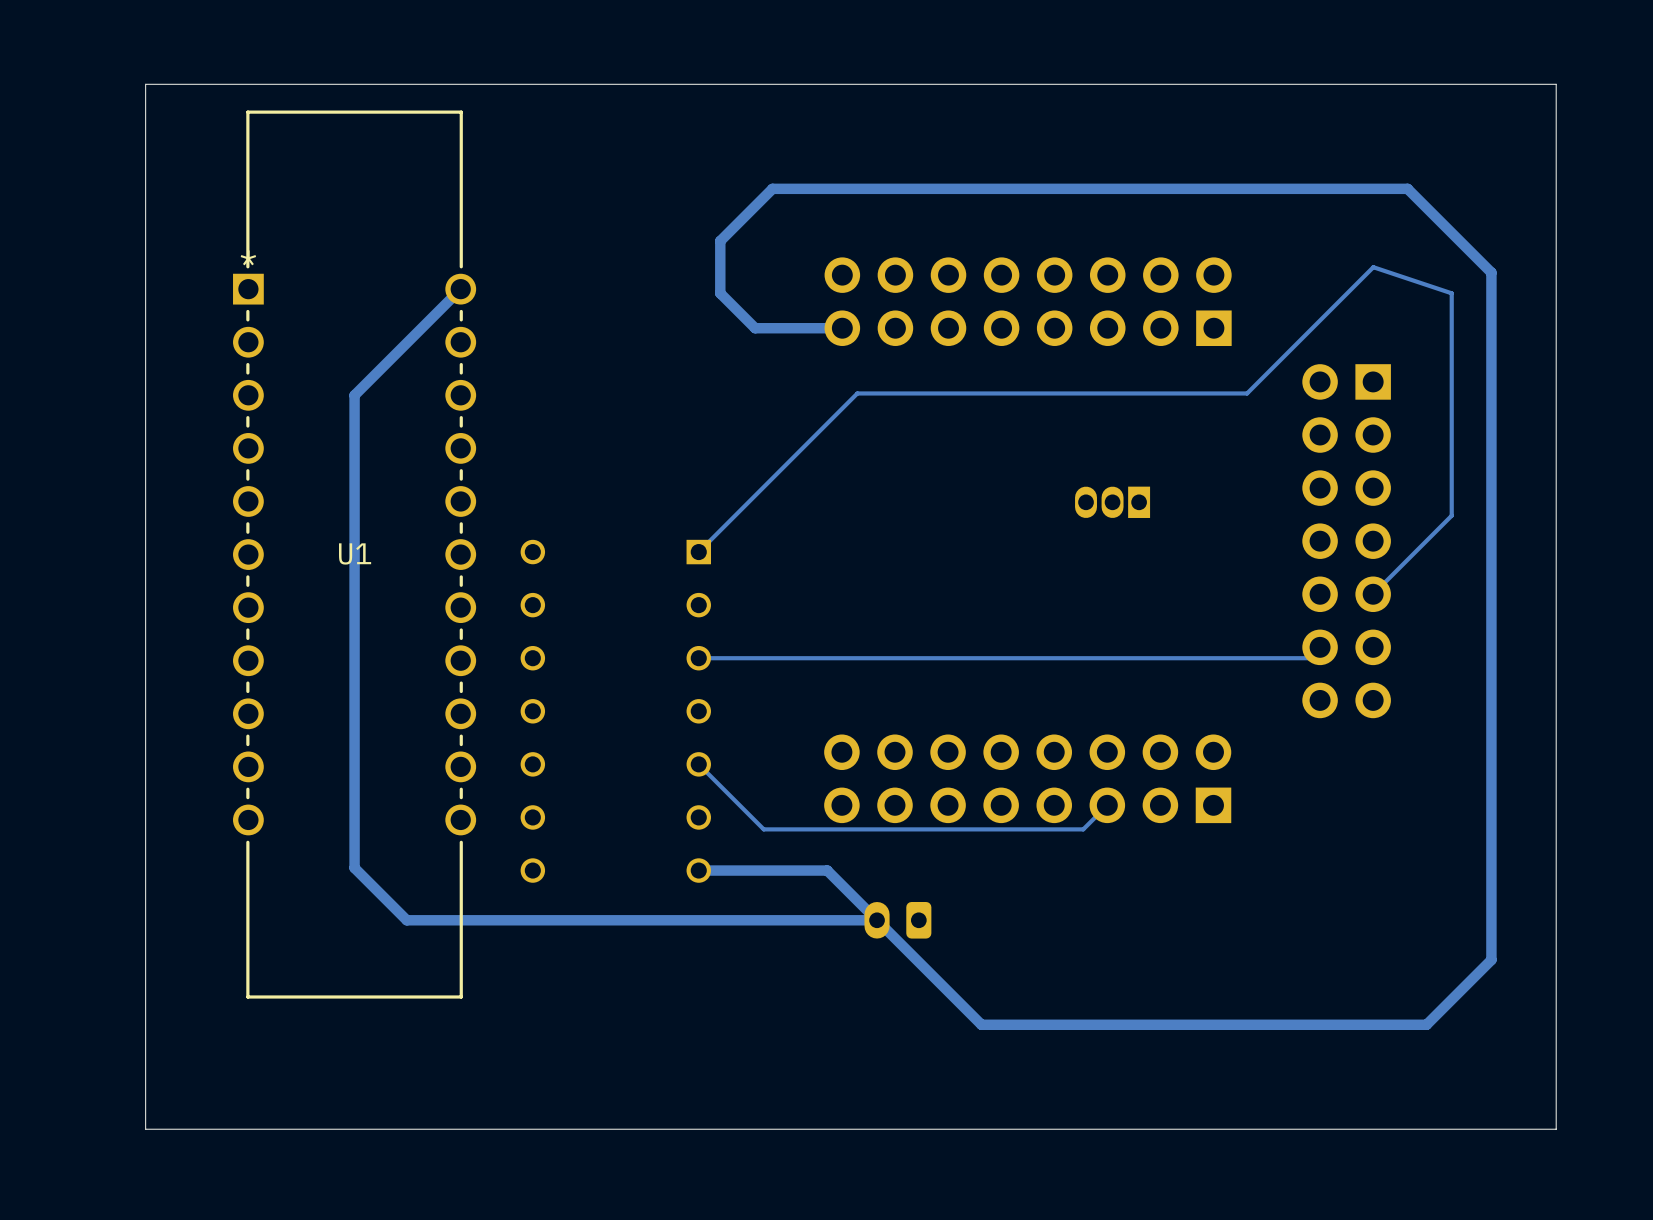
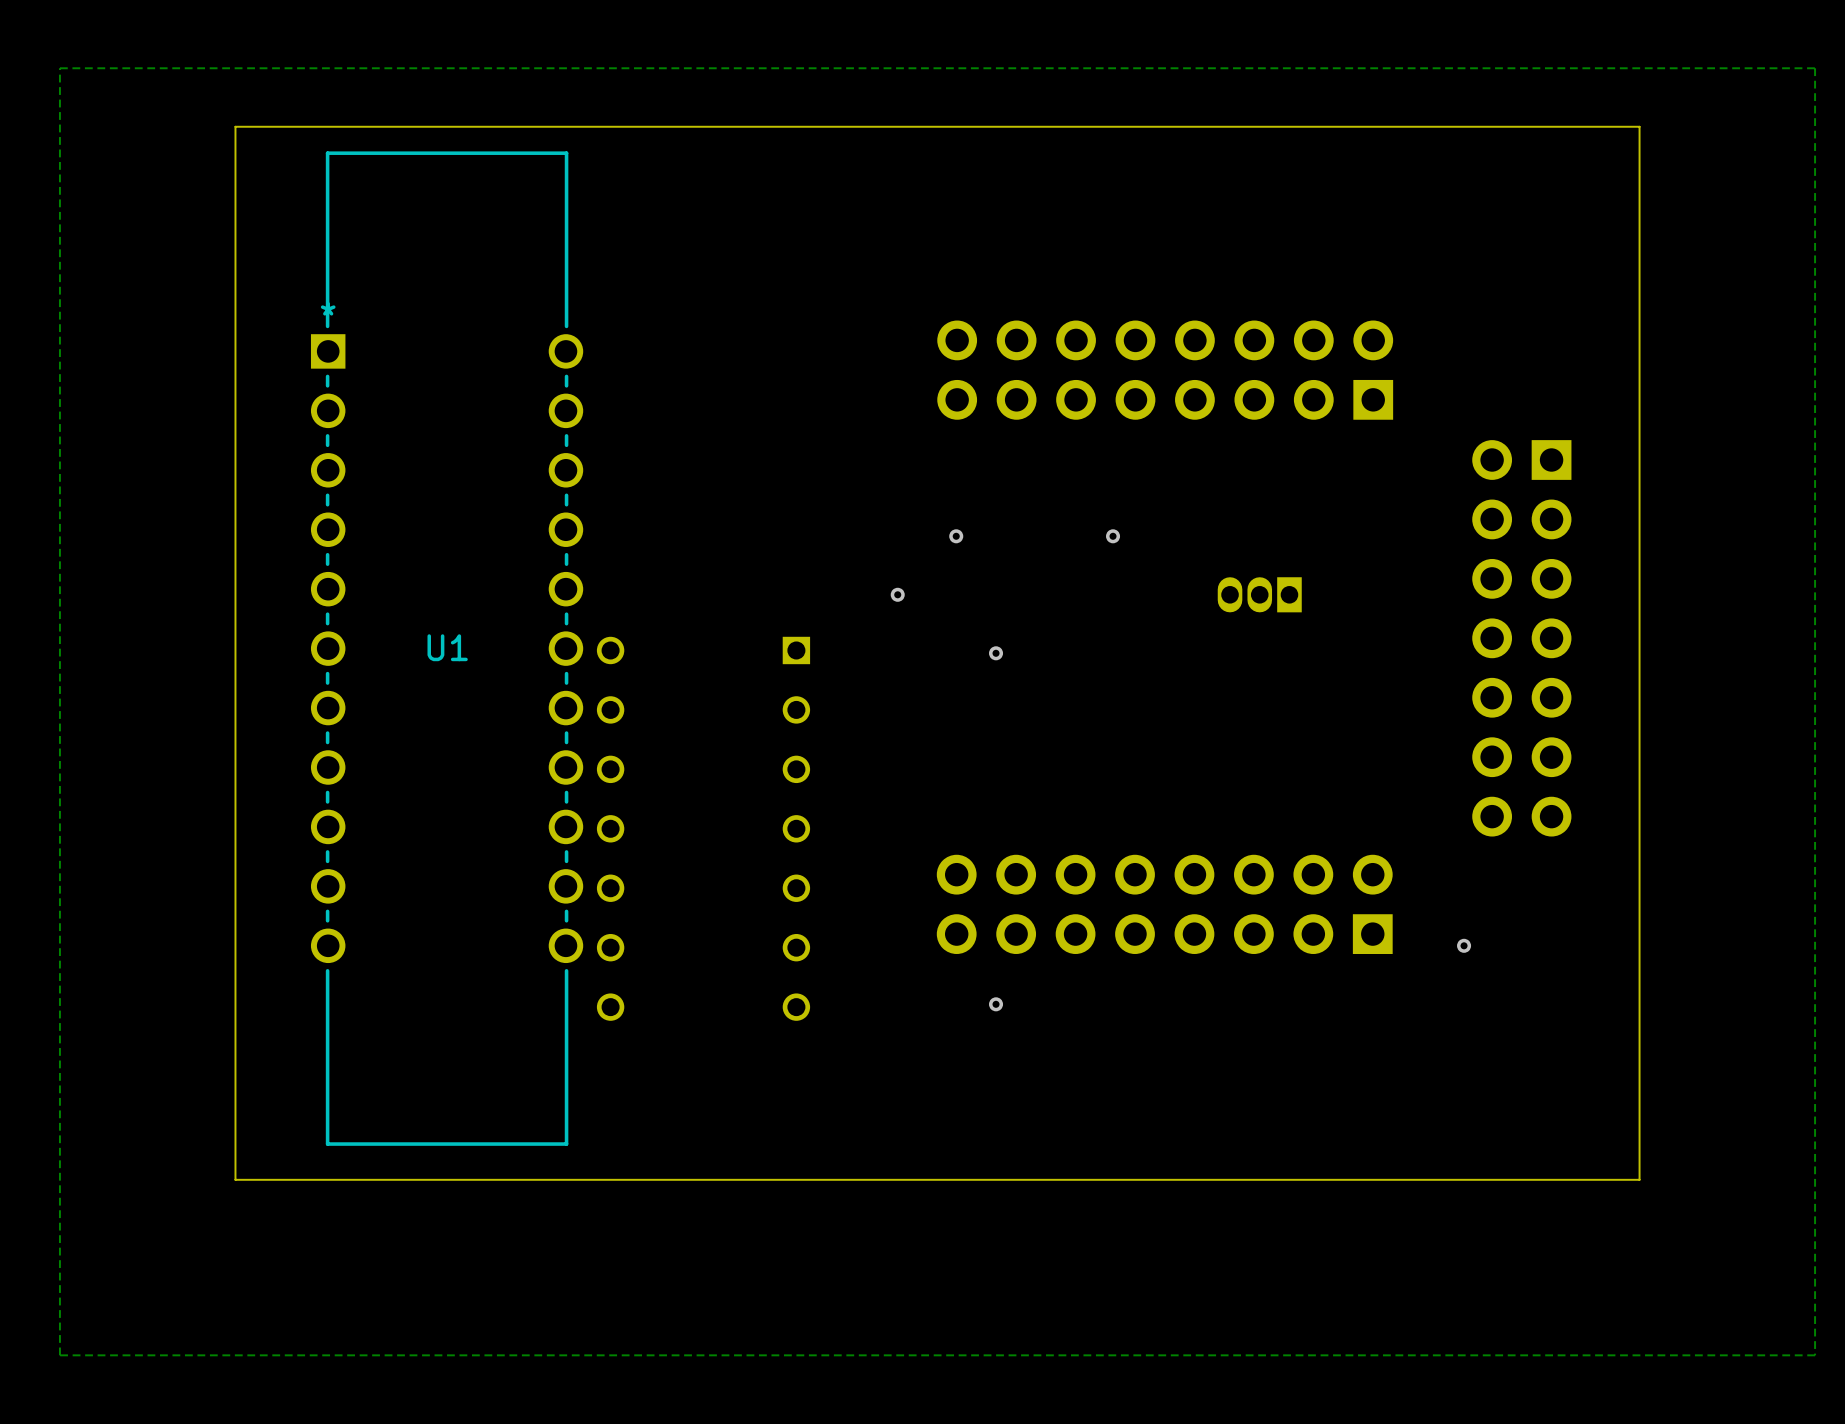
zone outline: none -> (1815, 68) (59, 68) (59, 1355) (1815, 1355) (1815, 68)
board edge: (1451, 84) (1556, 84) (1556, 1129) (145, 1129) (145, 84) (197, 84) -> (1639, 126) (1639, 1179) (235, 1179) (235, 126)
track: (460, 289) (354, 395) (354, 868) (406, 920) (877, 920) -> none
track: (842, 328) (755, 328) (720, 293) (720, 241) (772, 188) (1407, 188) (1491, 272) (1491, 959) (1426, 1024) (981, 1024) (827, 870) (698, 870) -> none
via: none -> (956, 536)
via: none -> (1113, 536)
via: none -> (897, 594)
track: (698, 552) (857, 393) (1247, 393) (1373, 267) (1451, 293) (1451, 515) (1373, 594) -> none
U1 position: (354, 554) -> (447, 648)
via: none -> (996, 653)
track: (1320, 647) (1309, 658) (698, 658) -> none
track: (698, 764) (763, 829) (1083, 829) (1107, 805) -> none
via: none -> (1464, 945)
via: none -> (996, 1004)
part: (897, 920) -> none

